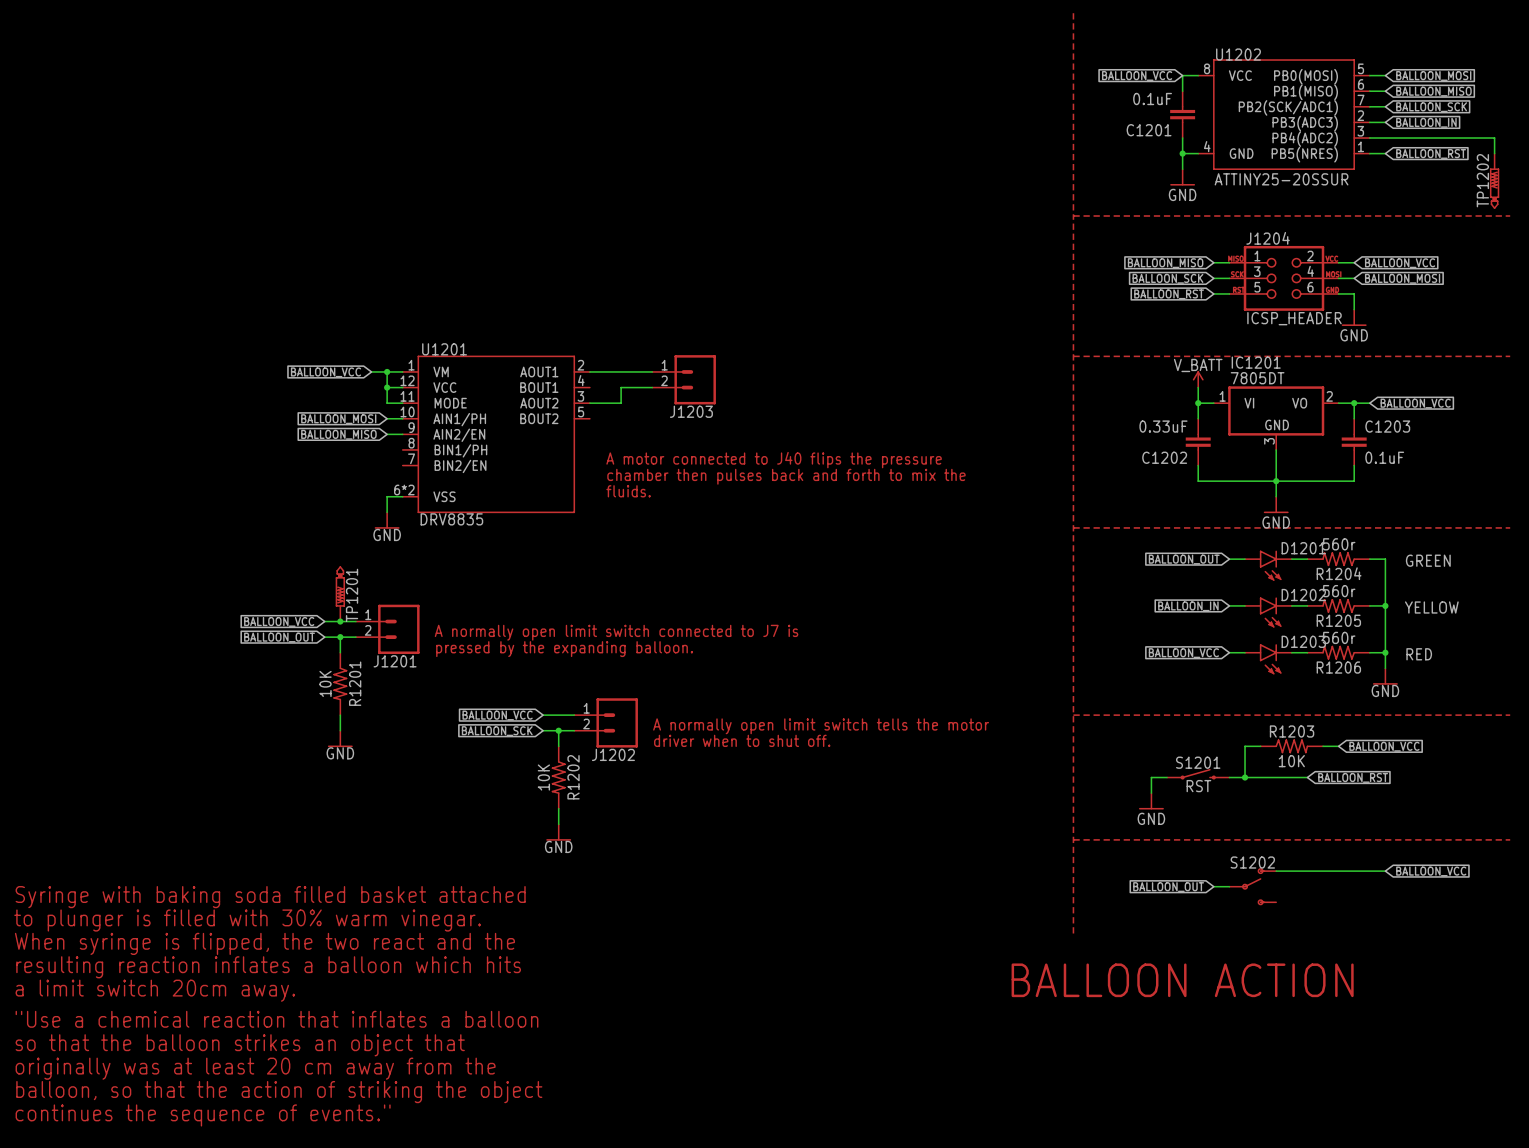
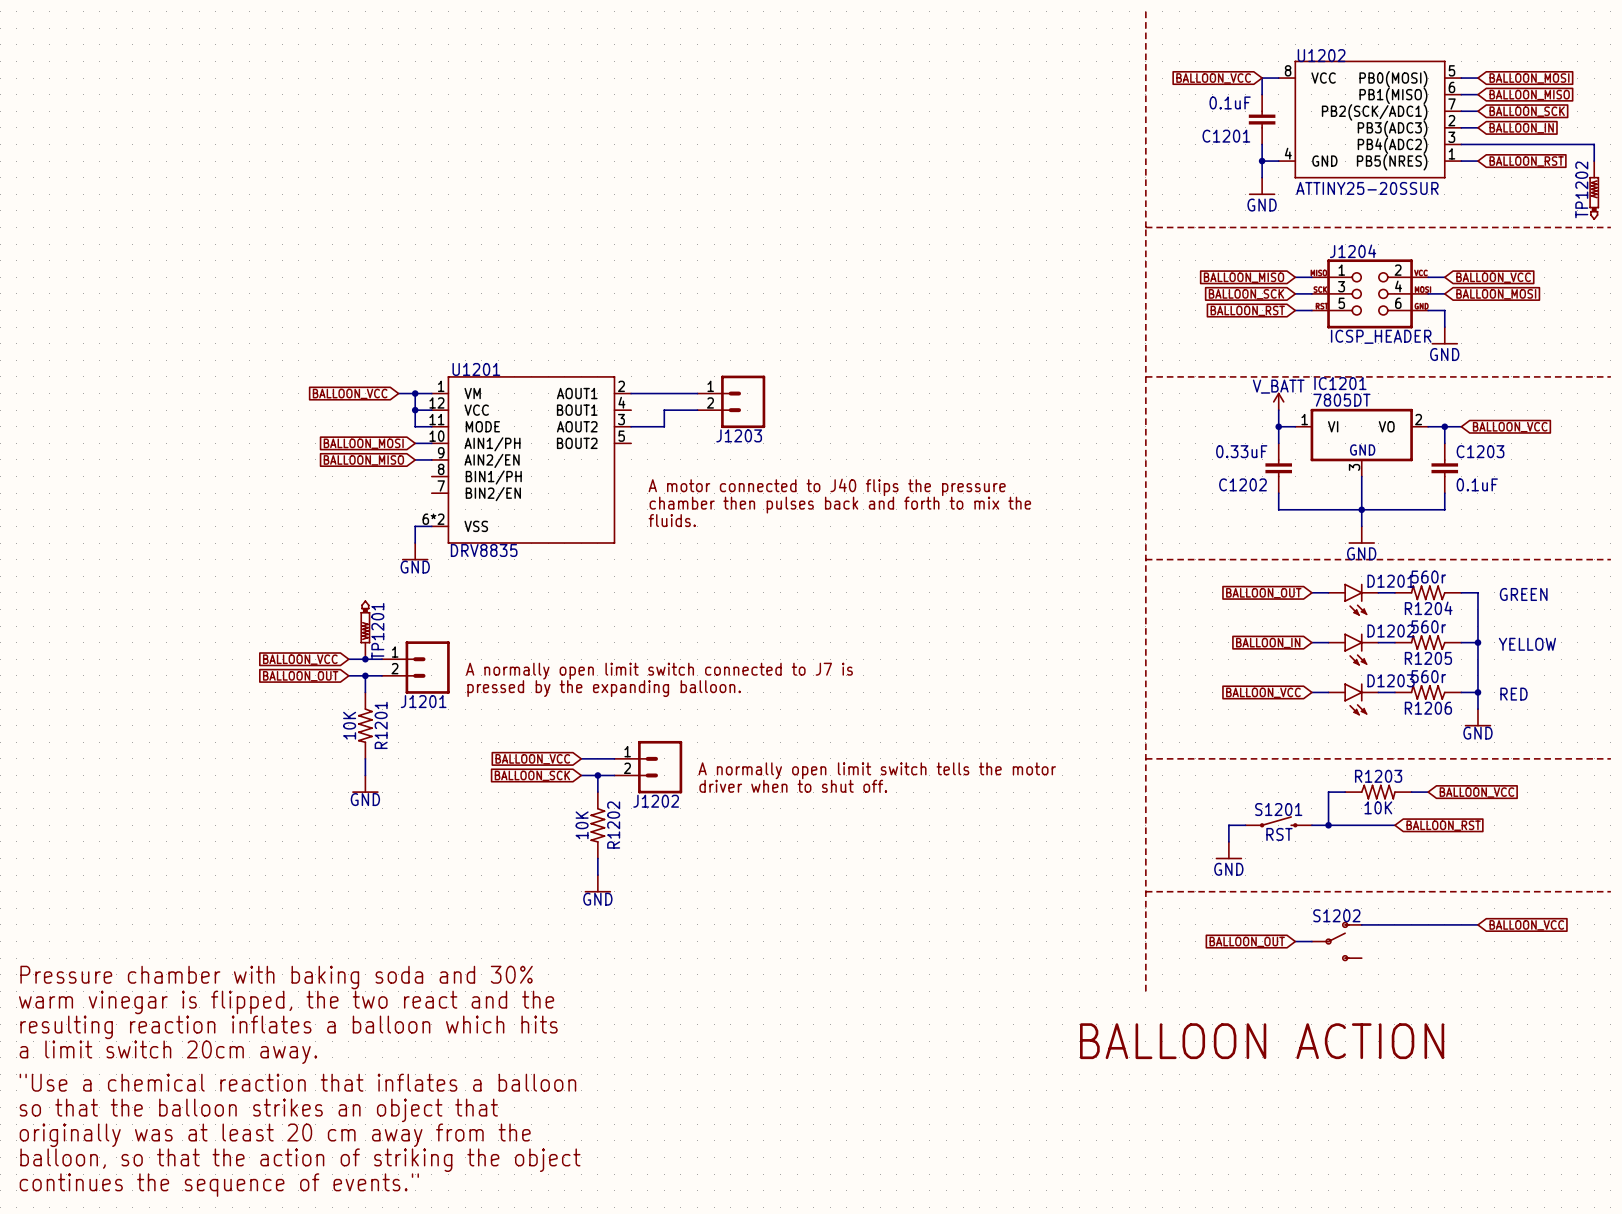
text: Syringe with baking soda filled basket attached (270, 897) -> none
text: to plunger is filled with 30% warm vinegar. (247, 920) -> Pressure chamber with baking soda and 30% (276, 977)
text: When syringe is flipped, the two react and the (264, 943) -> warm vinegar is flipped, the two react and the (286, 1002)

